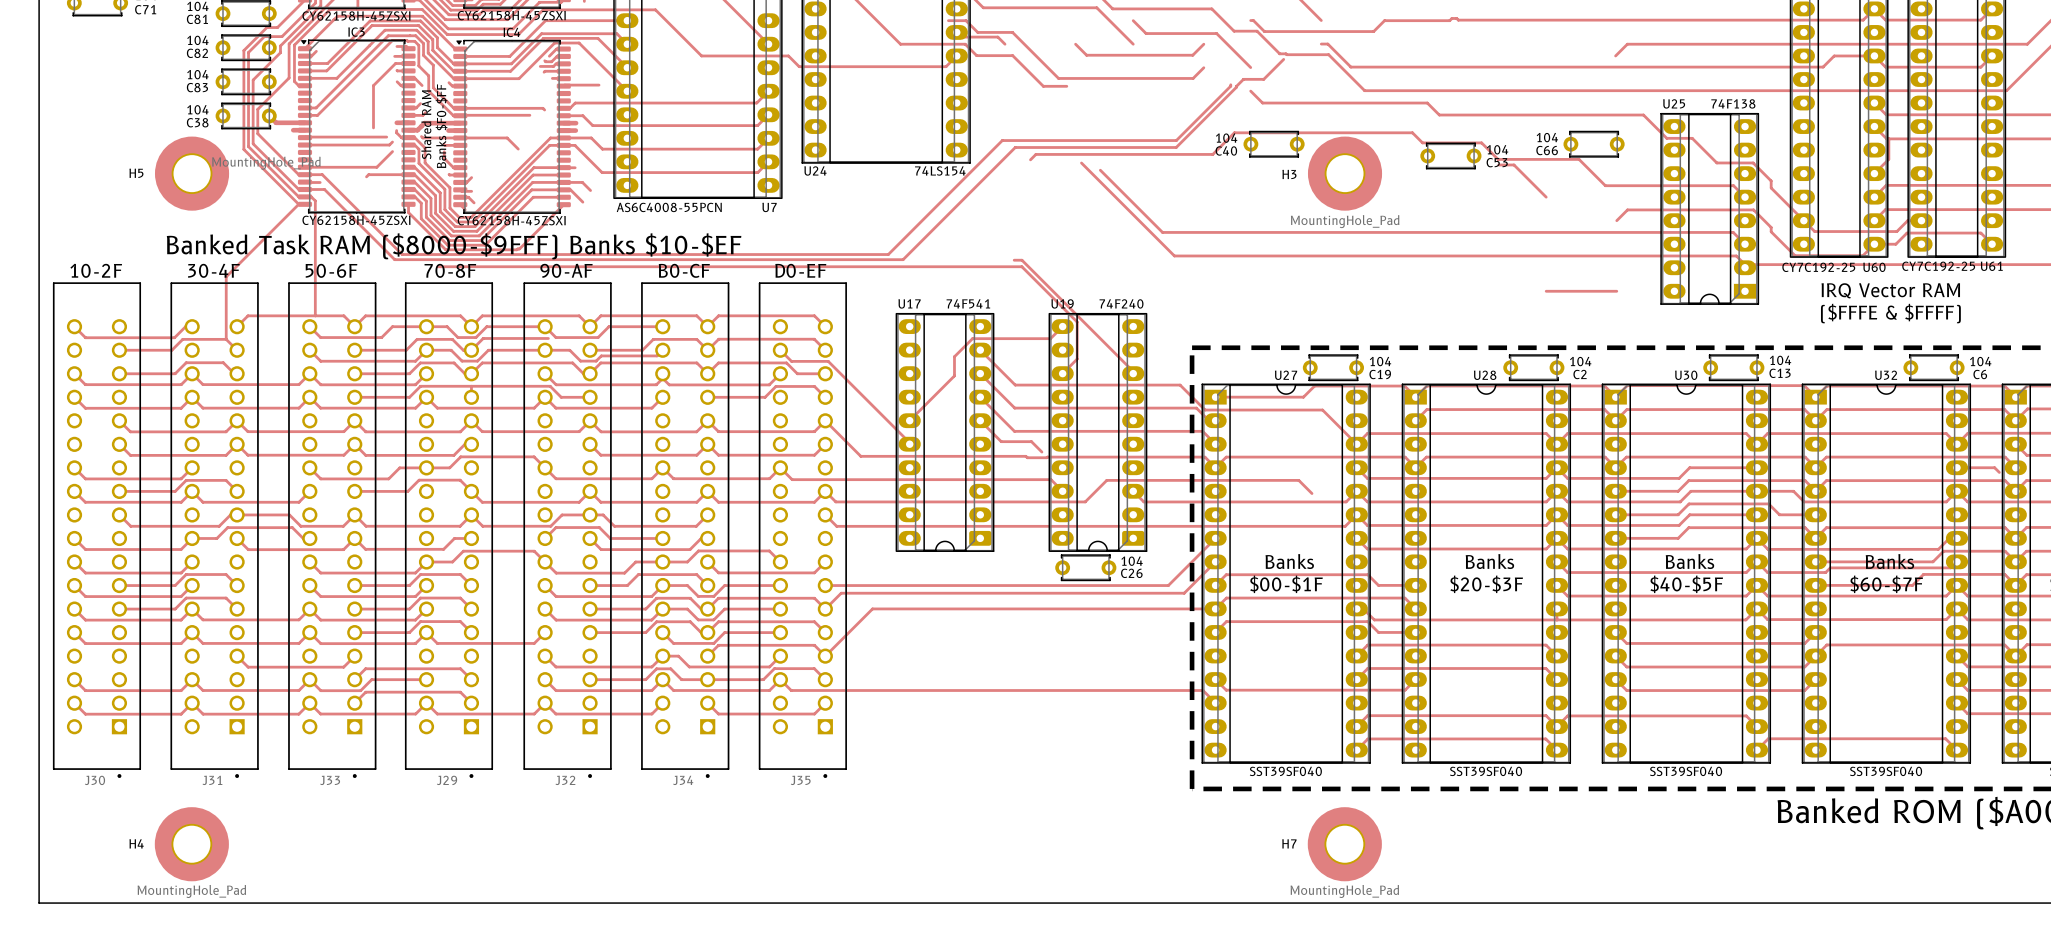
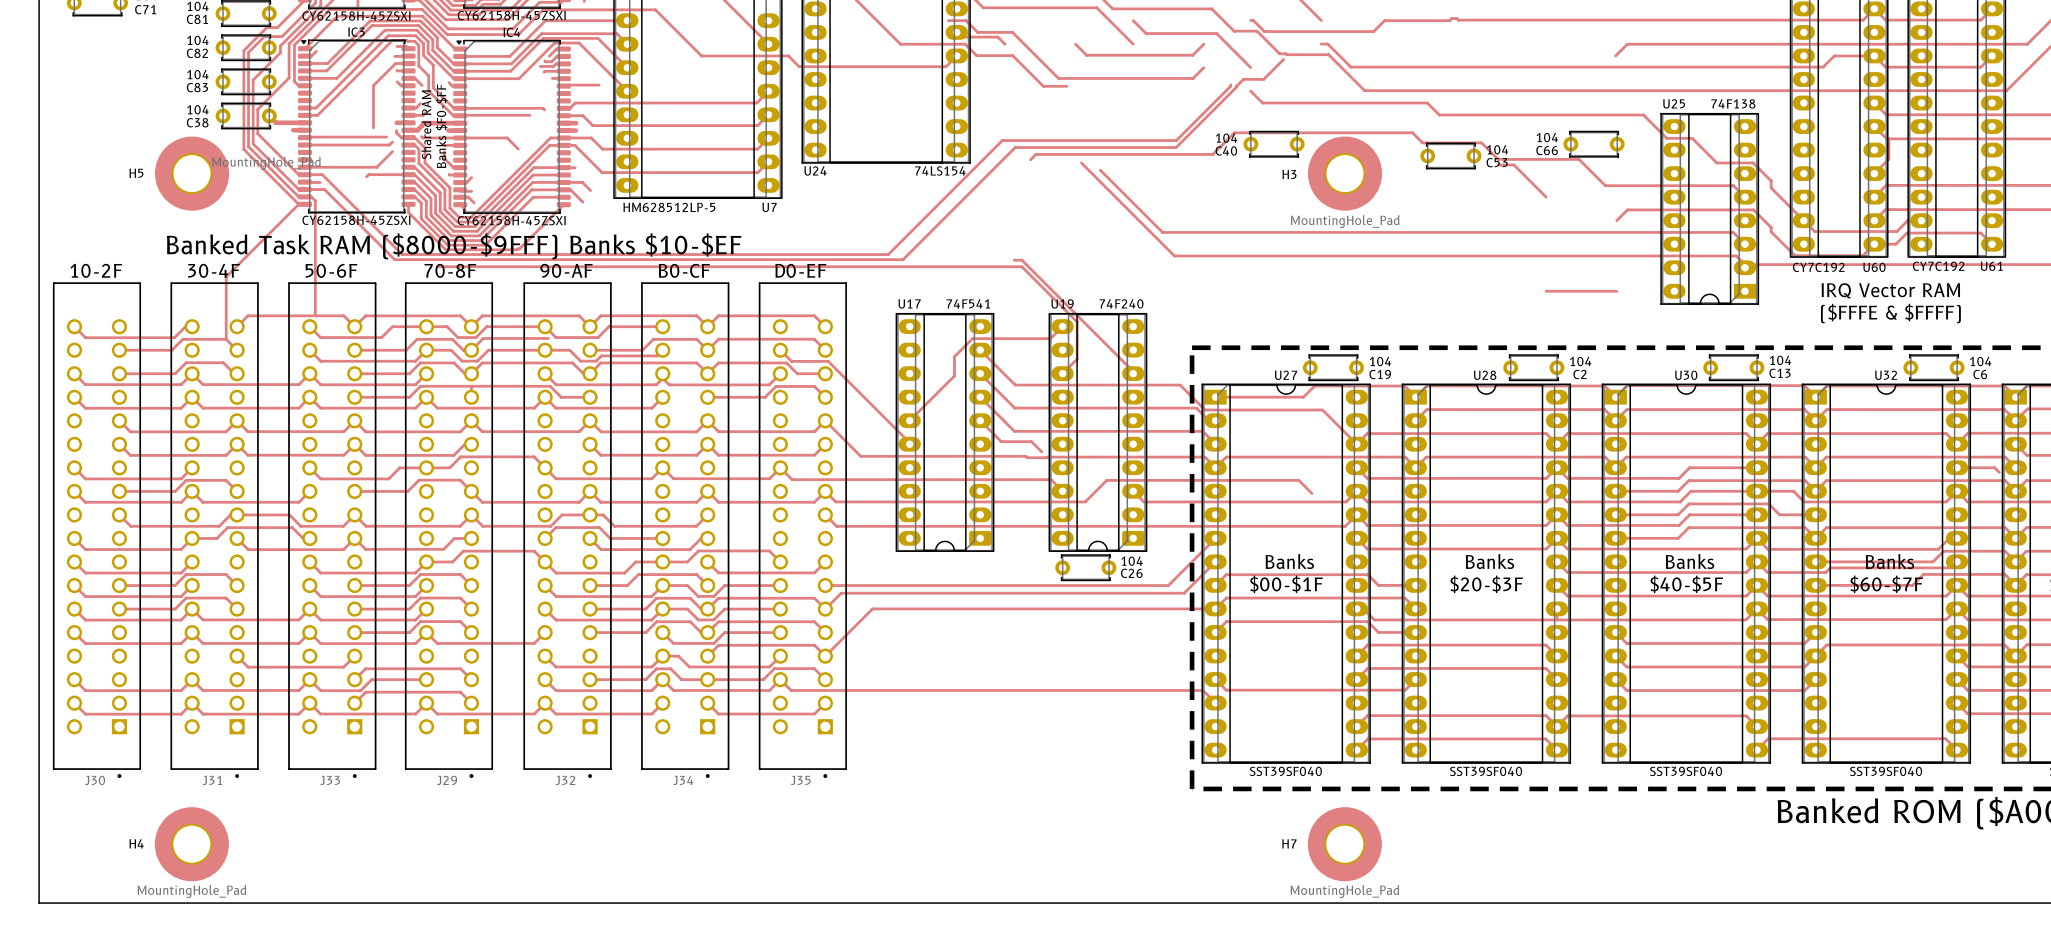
U7 value: AS6C4008-55PCN (669, 207) -> HM628512LP-5 (669, 207)
U61 value: CY7C192-25 (1938, 266) -> CY7C192 (1938, 266)
U60 value: CY7C192-25 (1818, 267) -> CY7C192 (1818, 267)

